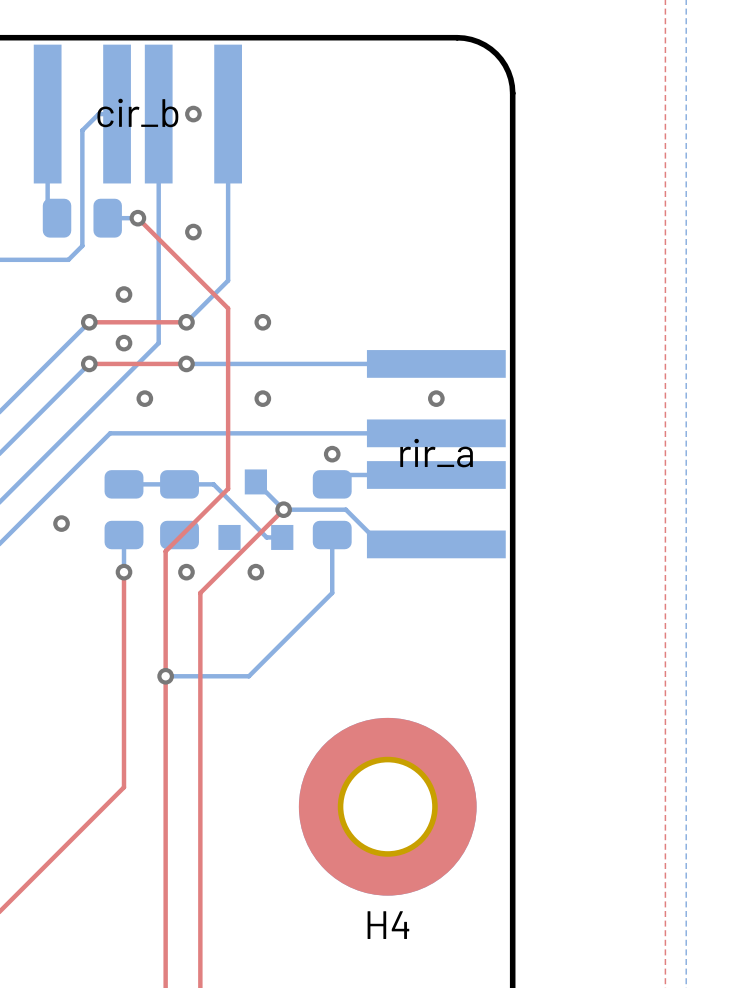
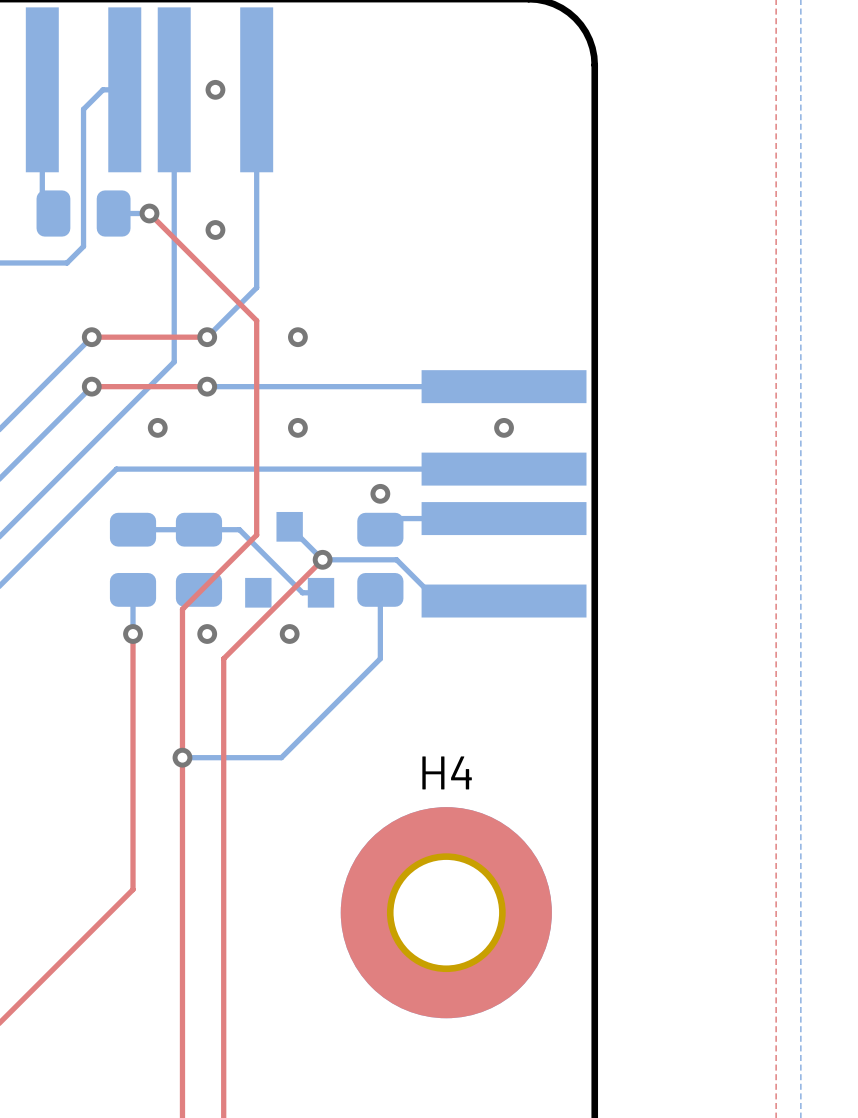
text: cir_b (137, 112) -> none
via: (124, 294) -> none
via: (124, 343) -> none
text: rir_a (436, 453) -> none
via: (61, 523) -> none
H4 name position: H4 (388, 925) -> H4 (447, 772)

